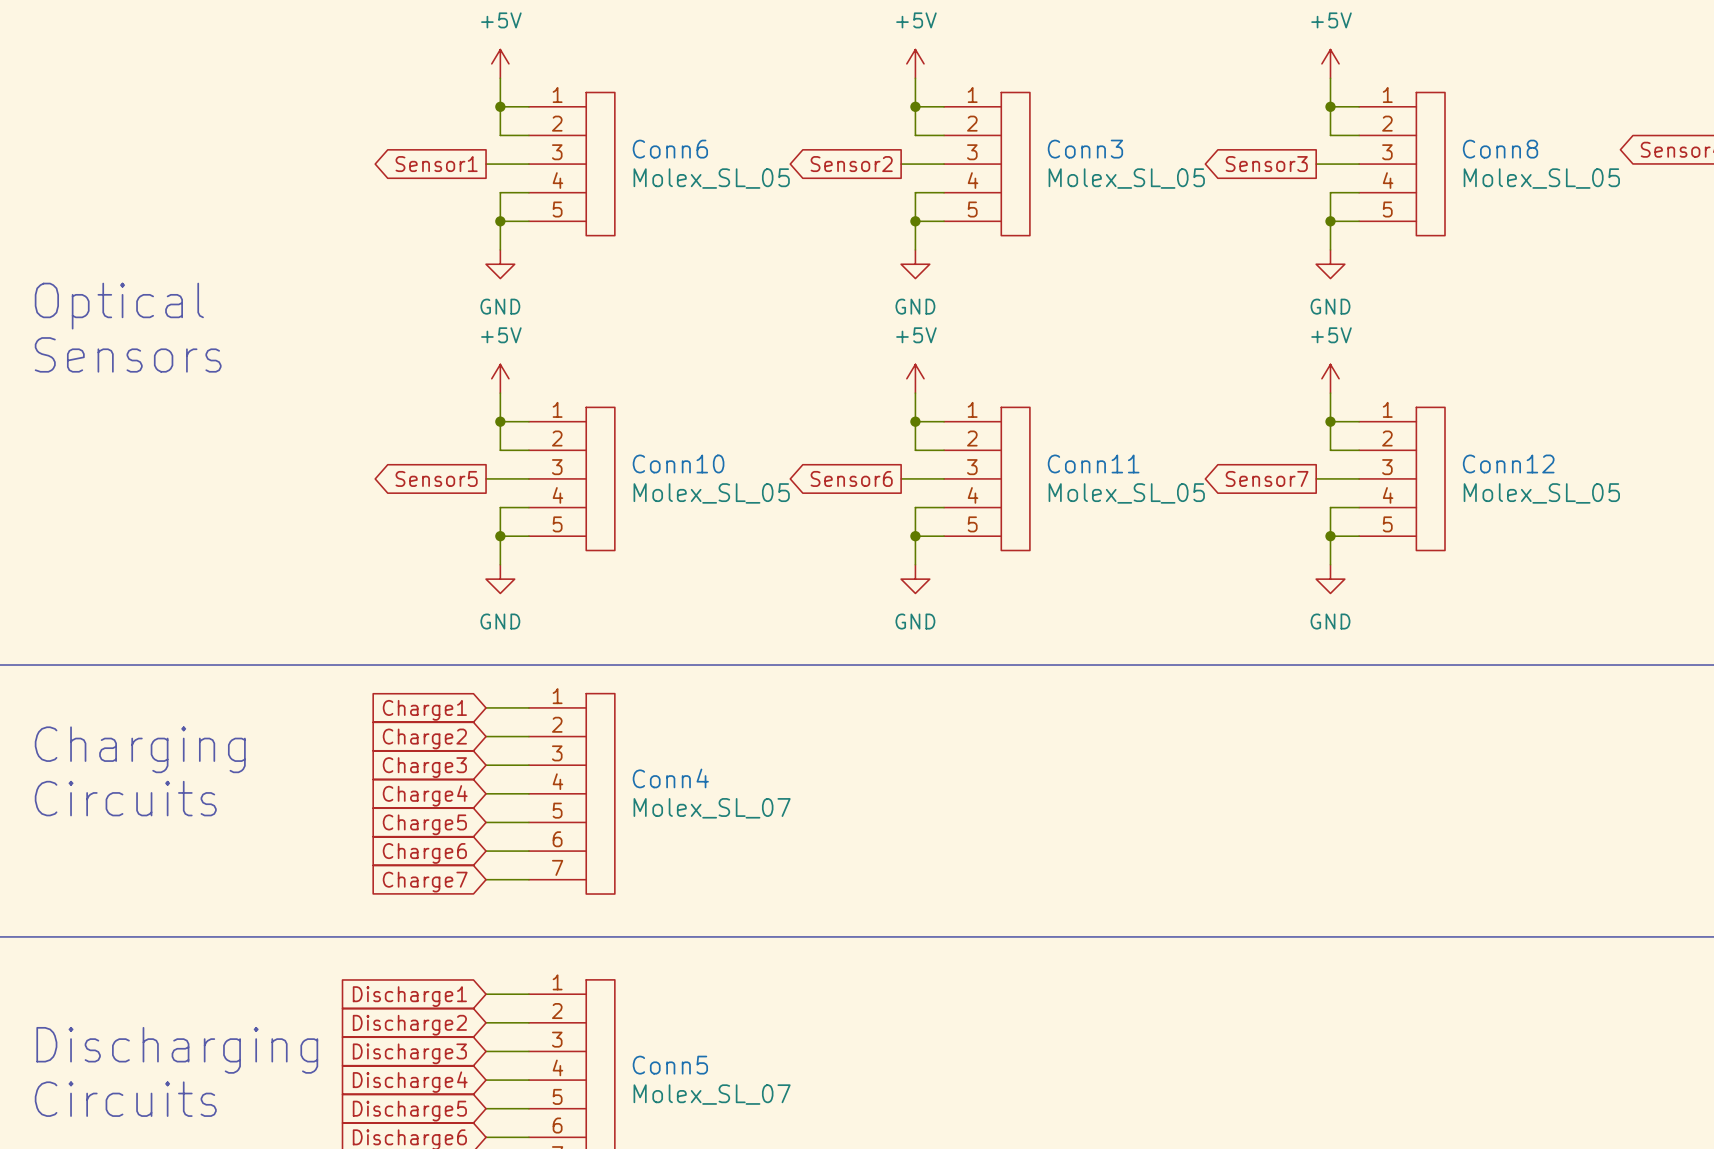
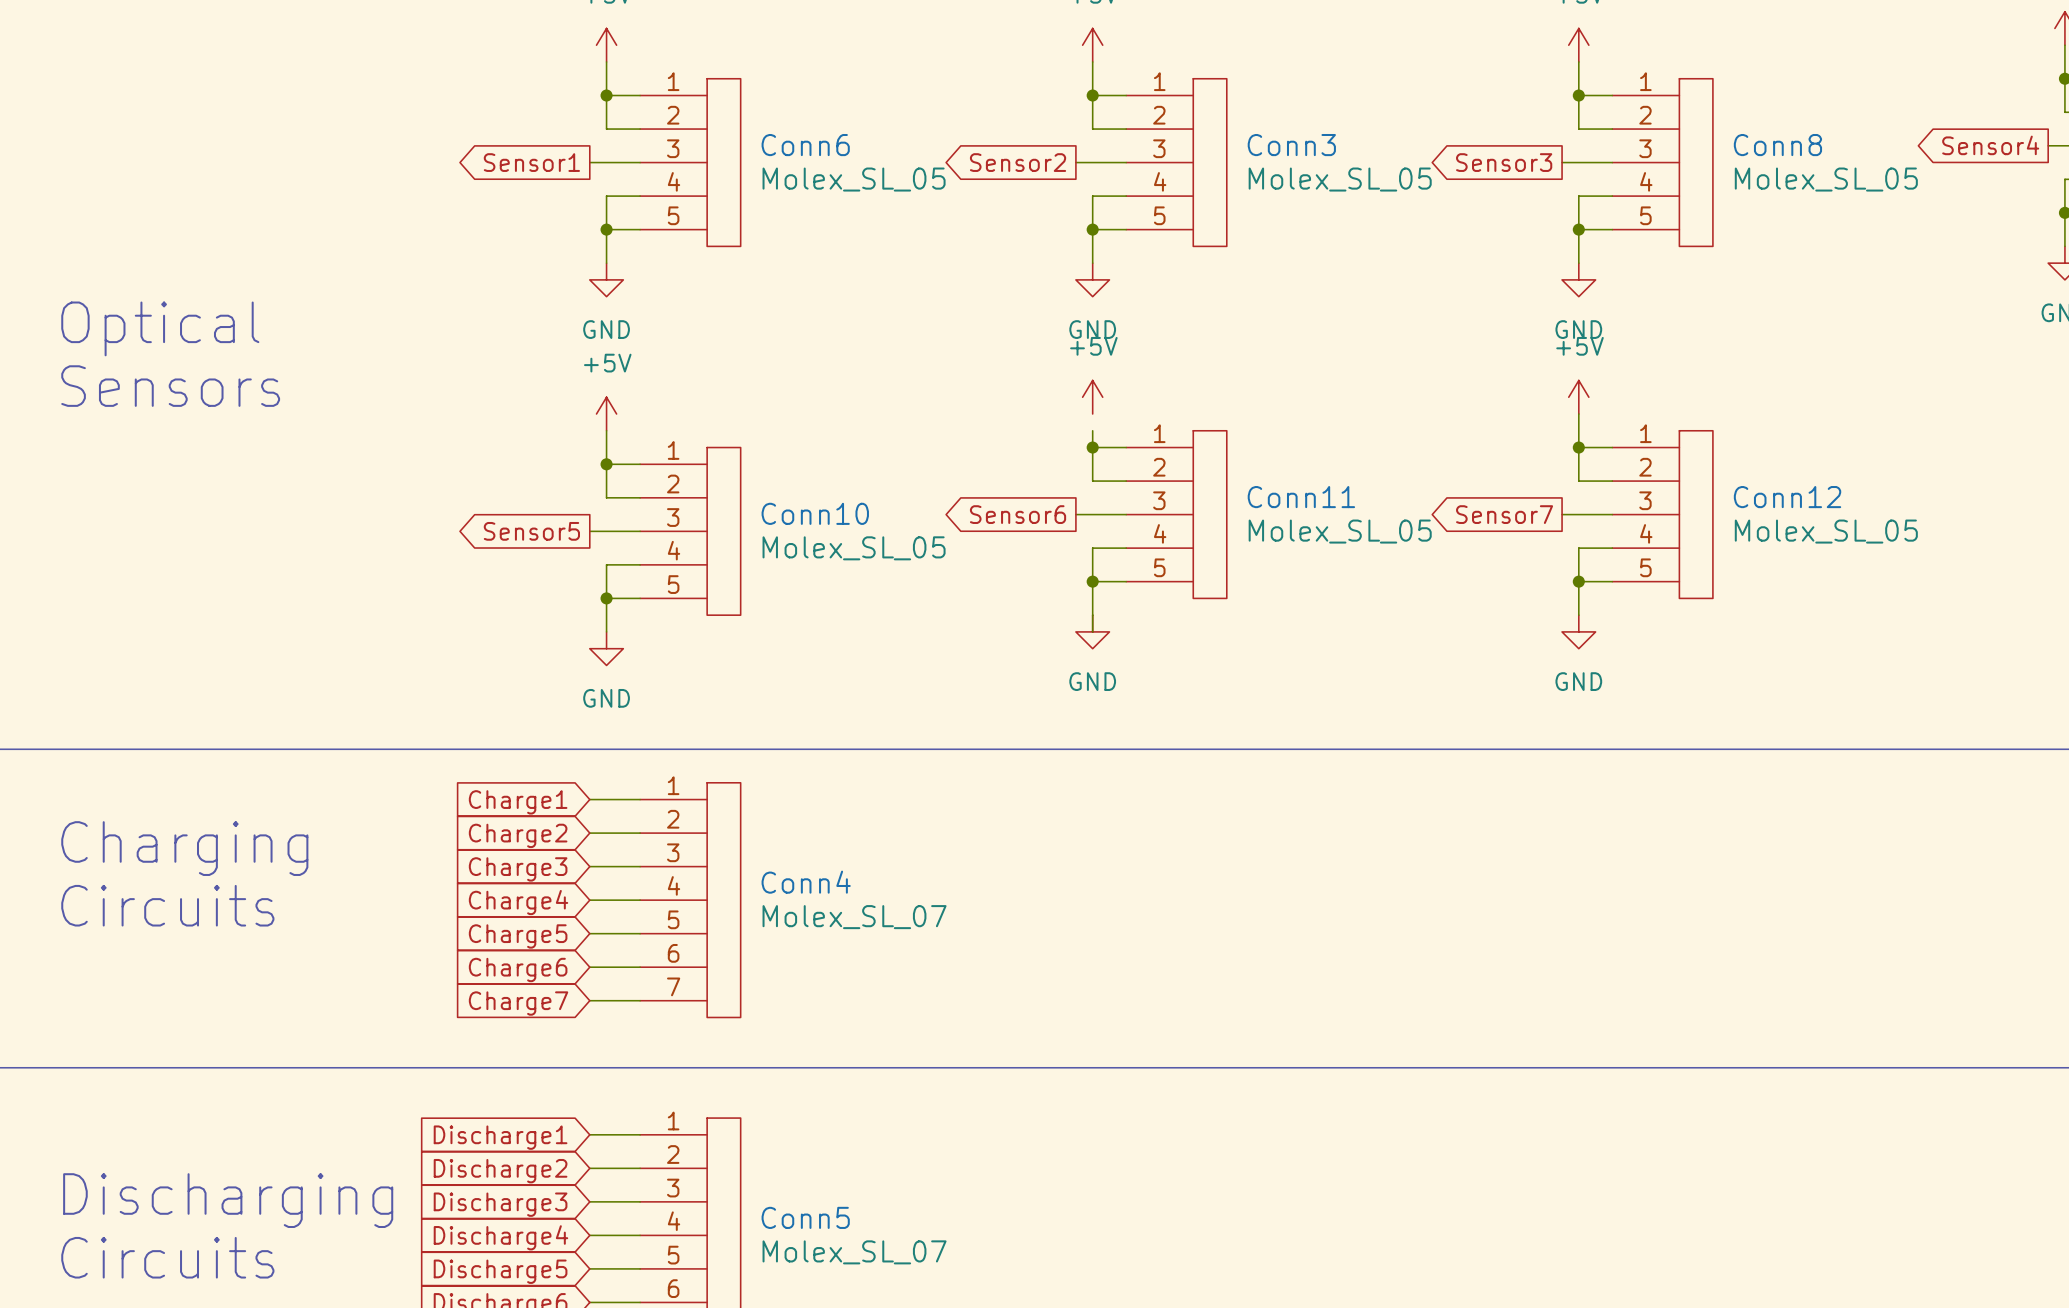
power symbol position: +5V (915, 378) -> +5V (1092, 397)
power symbol position: +5V (1330, 378) -> +5V (1578, 397)
wire: (915, 421) (944, 421) -> (1092, 447) (1126, 447)
junction position: (915, 421) -> (1092, 447)
wire: (1330, 421) (1359, 421) -> (1578, 447) (1612, 447)
junction position: (1330, 421) -> (1578, 447)
wire: (915, 436) (915, 450) (944, 450) -> (1092, 481) (1126, 481)
wire: (1330, 436) (1330, 450) (1359, 450) -> (1578, 481) (1612, 481)
global label position: Sensor6 (851, 478) -> Sensor6 (1018, 514)
wire: (901, 478) (944, 478) -> (1075, 514) (1126, 514)
Conn11 position: (986, 478) -> (1176, 514)
global label position: Sensor7 (1267, 478) -> Sensor7 (1504, 514)
wire: (1316, 478) (1359, 478) -> (1562, 514) (1612, 514)
Conn12 position: (1402, 478) -> (1662, 514)
wire: (915, 507) (944, 507) -> (1092, 564) (1092, 548) (1126, 548)
wire: (1330, 507) (1359, 507) -> (1578, 564) (1578, 548) (1612, 548)
wire: (915, 536) (944, 536) -> (1092, 581) (1126, 581)
junction position: (915, 536) -> (1092, 581)
wire: (1330, 536) (1359, 536) -> (1578, 581) (1612, 581)
junction position: (1330, 536) -> (1578, 581)
power symbol position: GND (915, 579) -> GND (1092, 631)
power symbol position: GND (1330, 579) -> GND (1578, 631)

